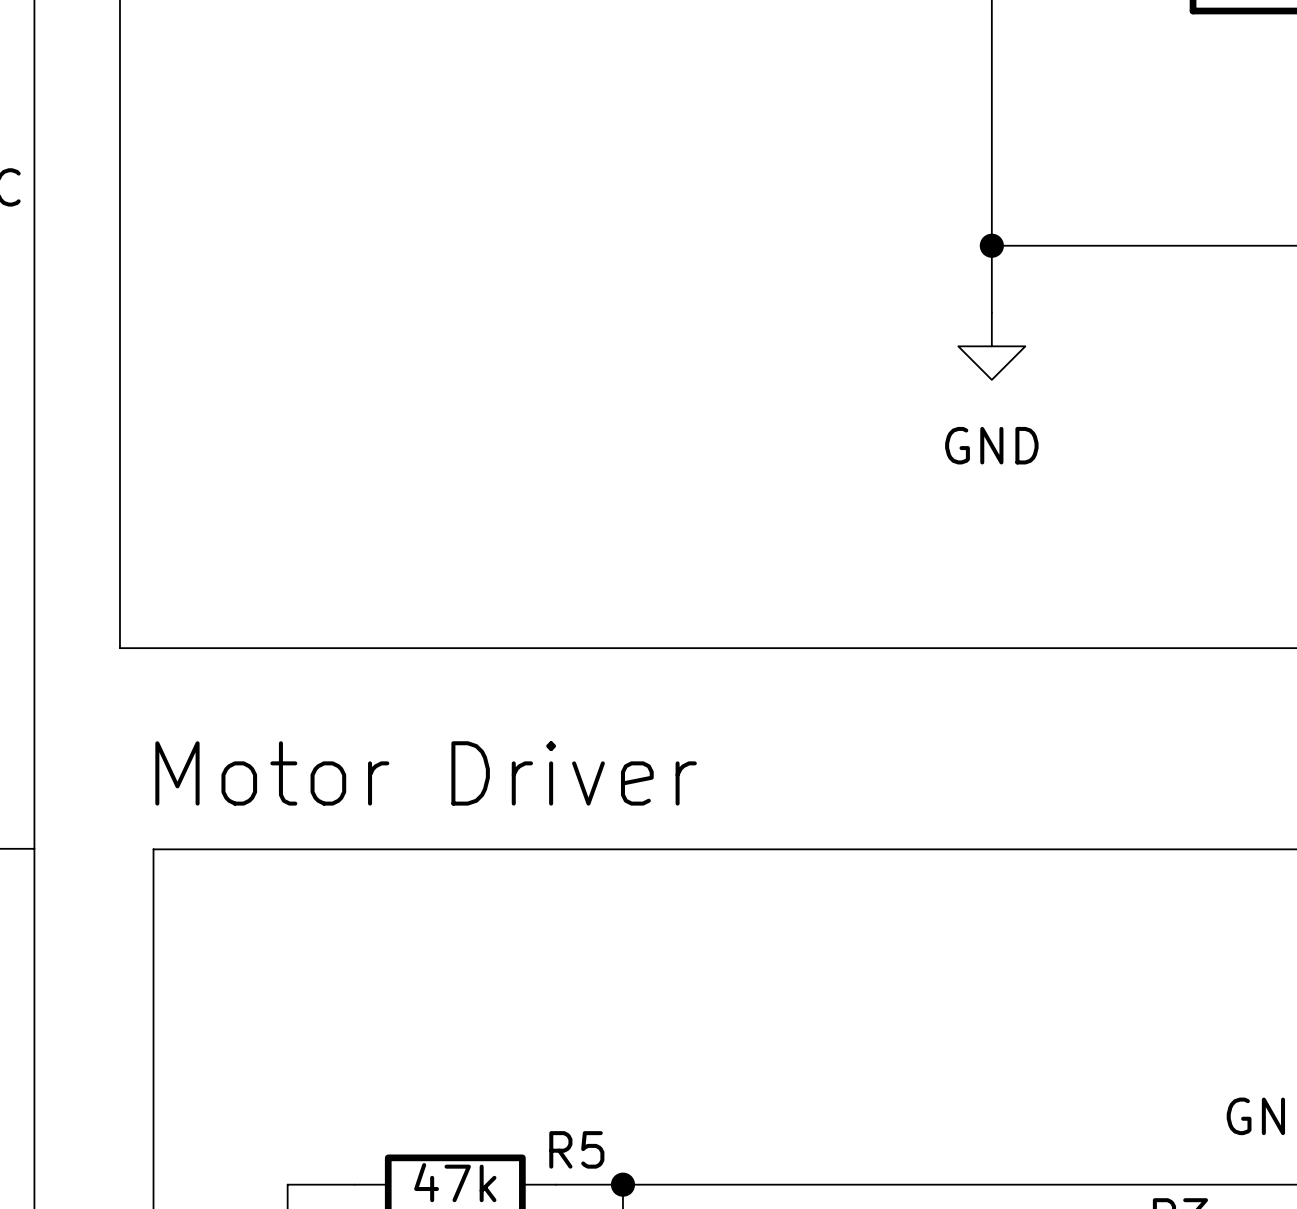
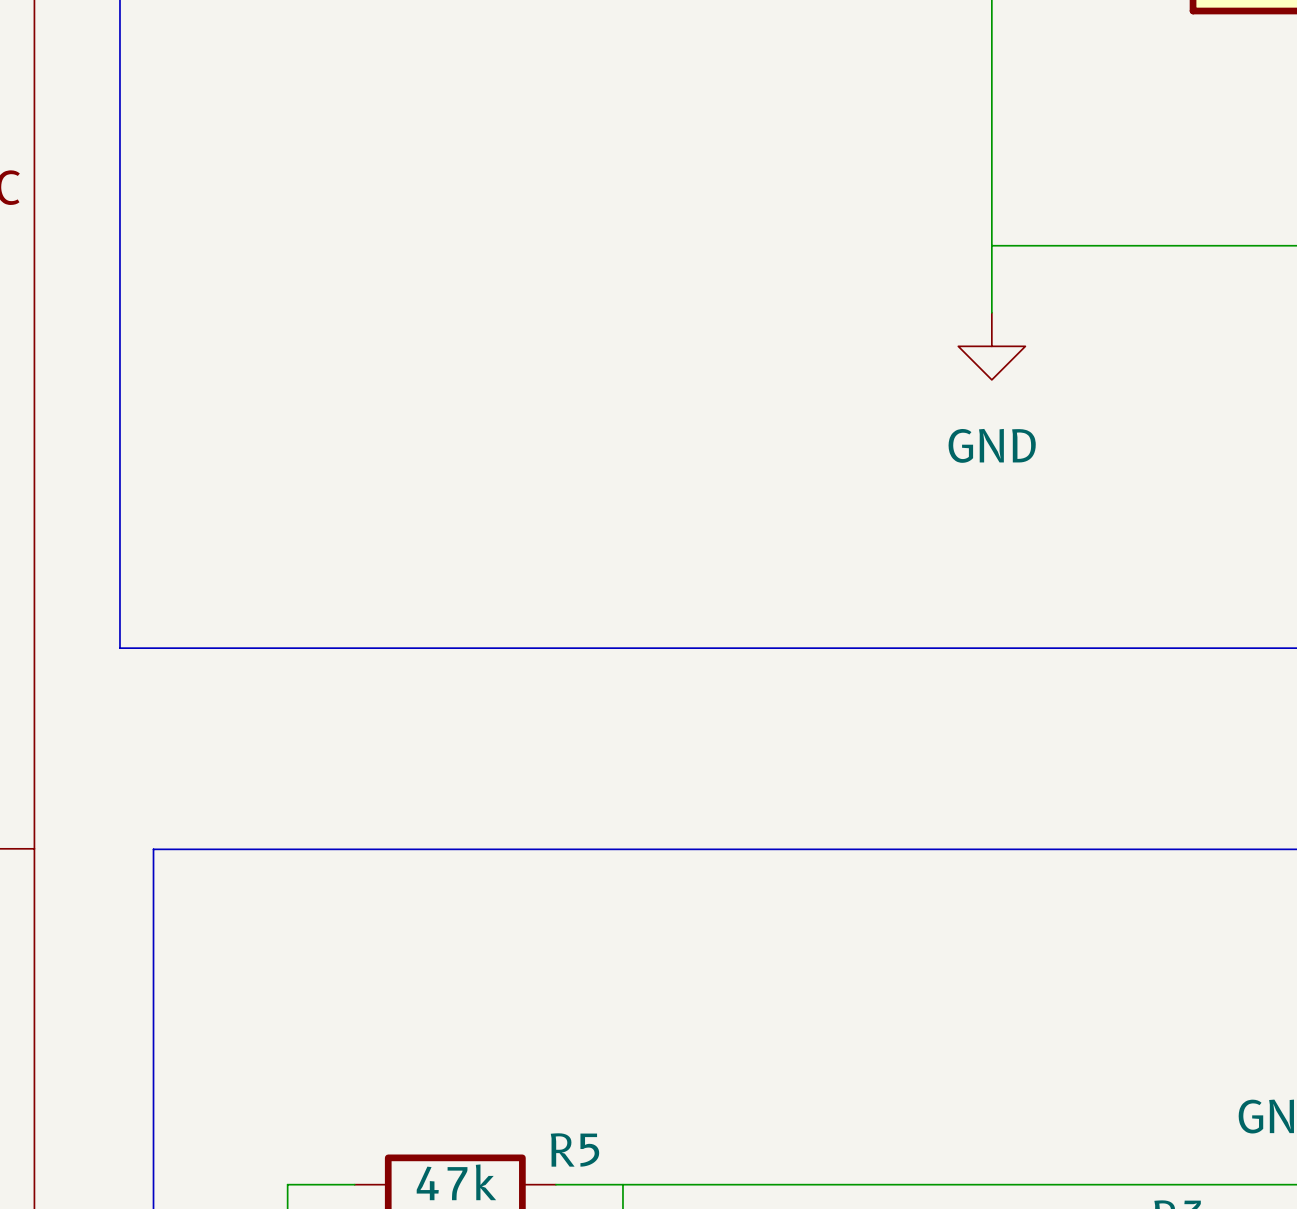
junction: (991, 245) -> none
text: Motor Driver (426, 773) -> none
junction: (622, 1184) -> none

